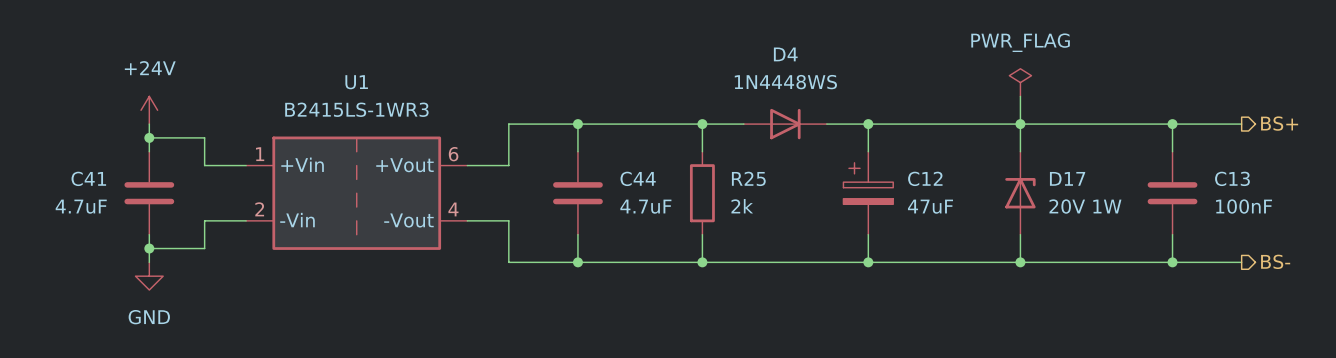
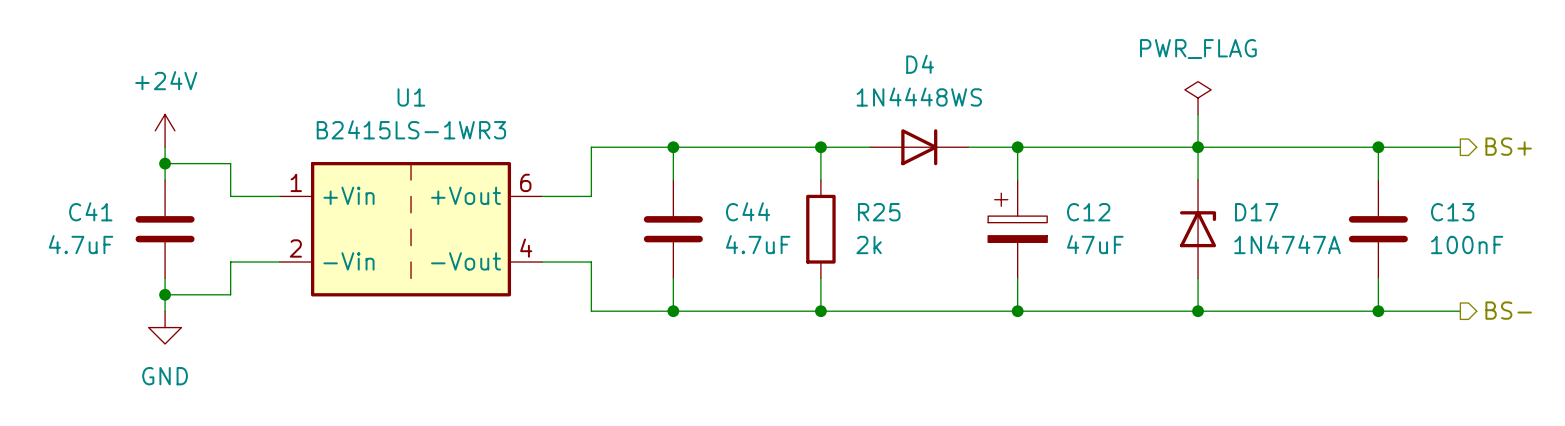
D17 value: 20V 1W (1085, 206) -> 1N4747A (1287, 244)

